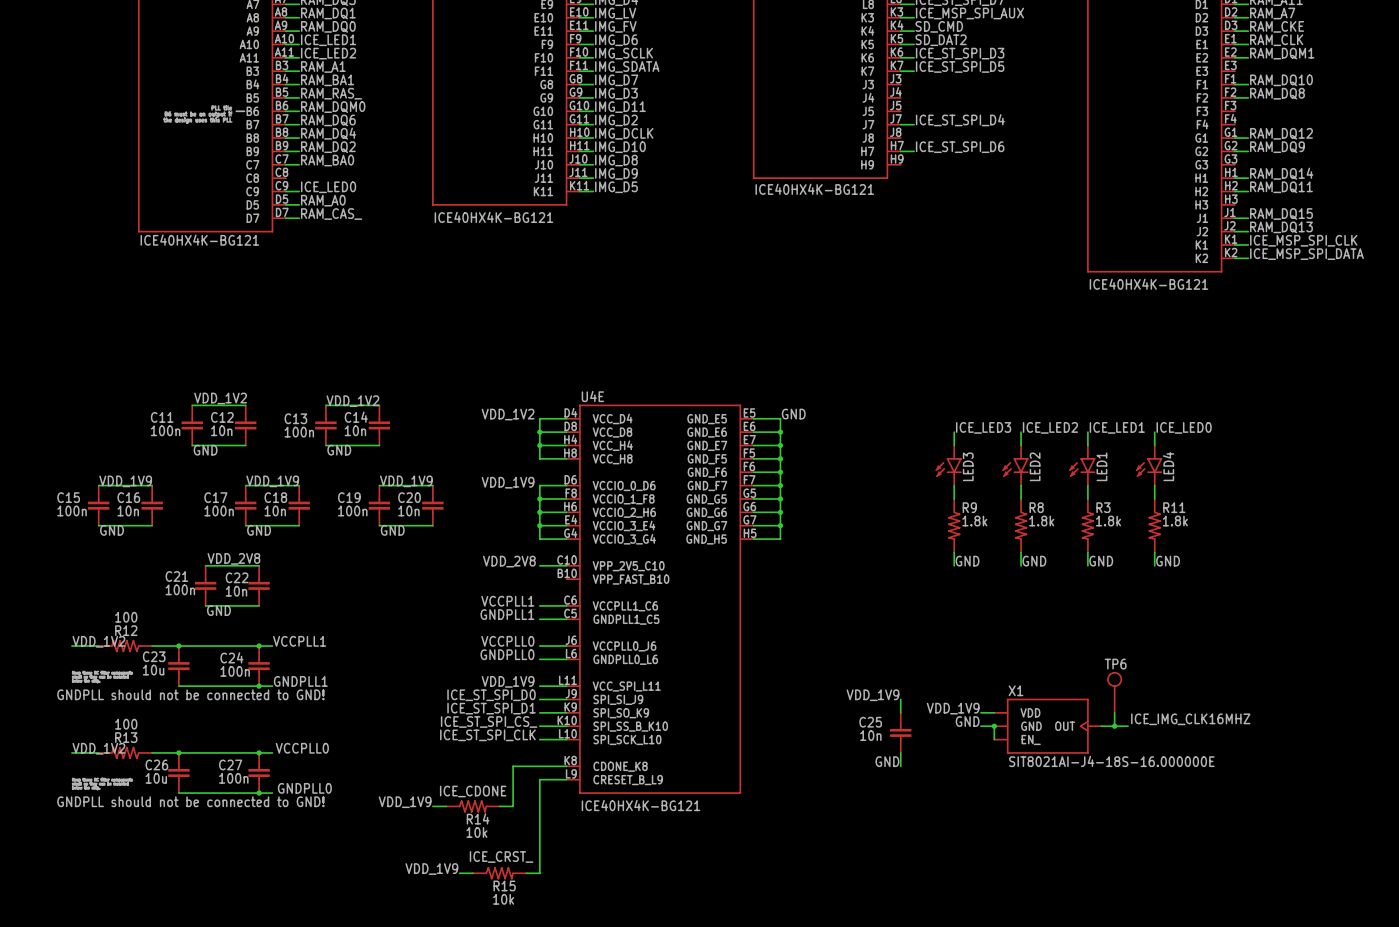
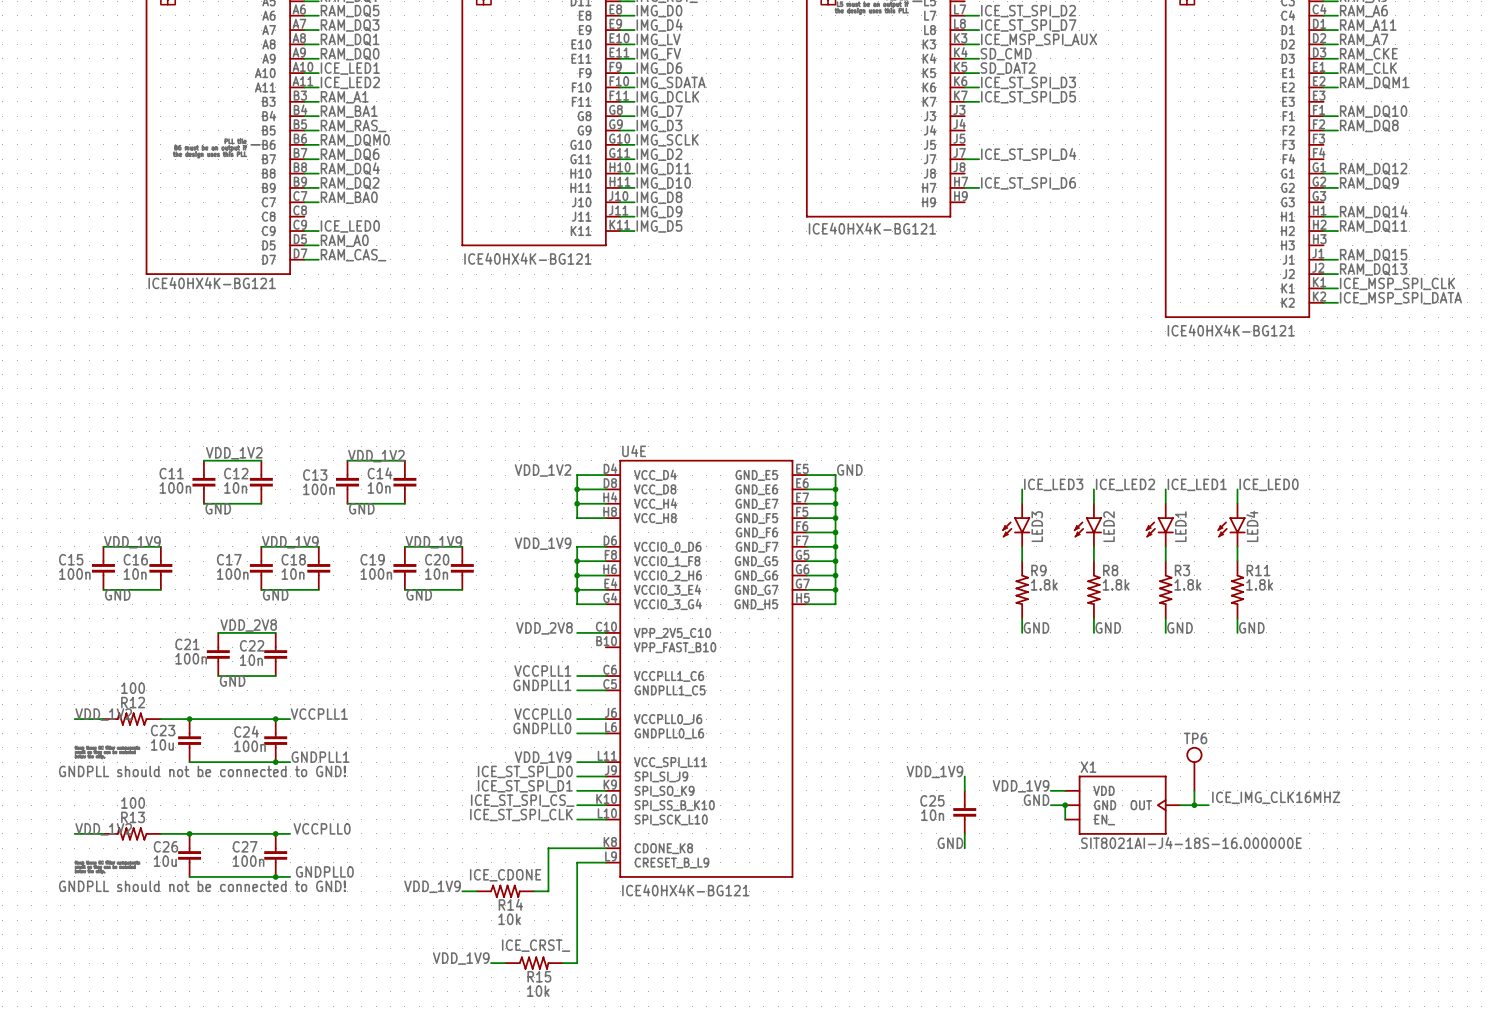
label: IMG_SCLK (624, 53) -> IMG_SDATA (671, 82)
label: IMG_SDATA (627, 66) -> IMG_DCLK (667, 97)
label: IMG_D11 (620, 107) -> IMG_SCLK (667, 140)
label: IMG_DCLK (624, 133) -> IMG_D11 (663, 169)

